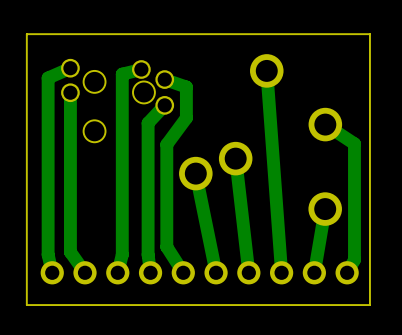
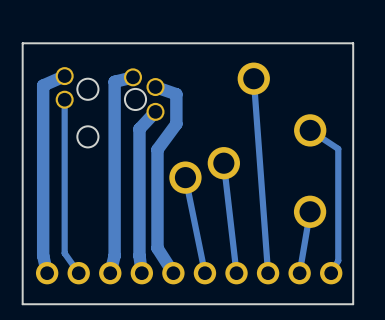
bottom track width: thick (266, 70) (281, 272) -> thin (253, 78) (268, 273)
bottom track width: thick (70, 92) (70, 252) (85, 272) -> thin (64, 99) (64, 253) (78, 273)
bottom track width: thick (325, 124) (354, 143) (354, 259) (347, 272) -> thin (310, 130) (338, 148) (338, 260) (331, 273)
bottom track width: thick (235, 158) (248, 272) -> thin (223, 163) (236, 273)
bottom track width: thick (195, 173) (216, 272) -> thin (185, 177) (204, 273)
bottom track width: thick (325, 209) (314, 272) -> thin (310, 211) (299, 273)

